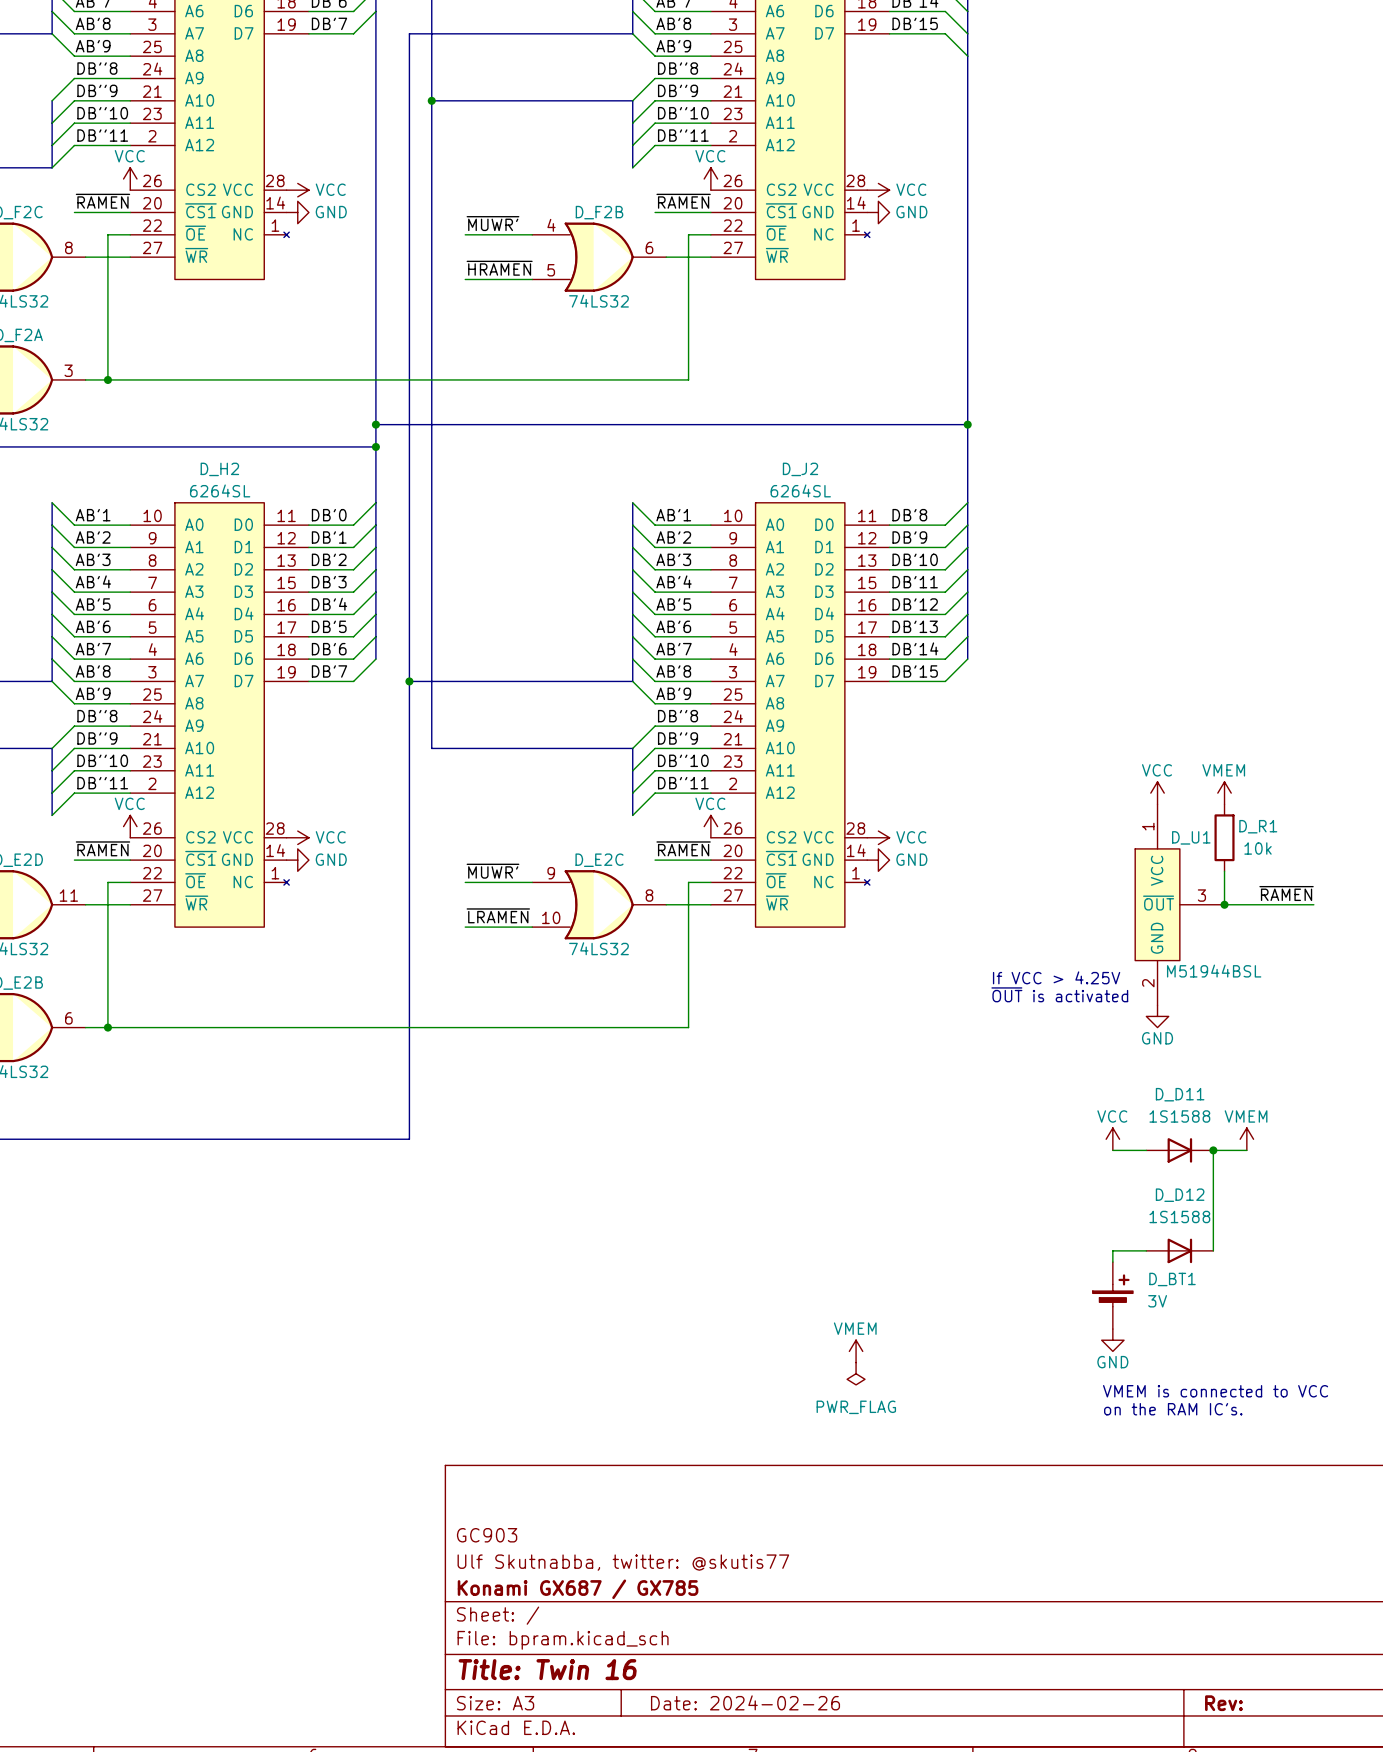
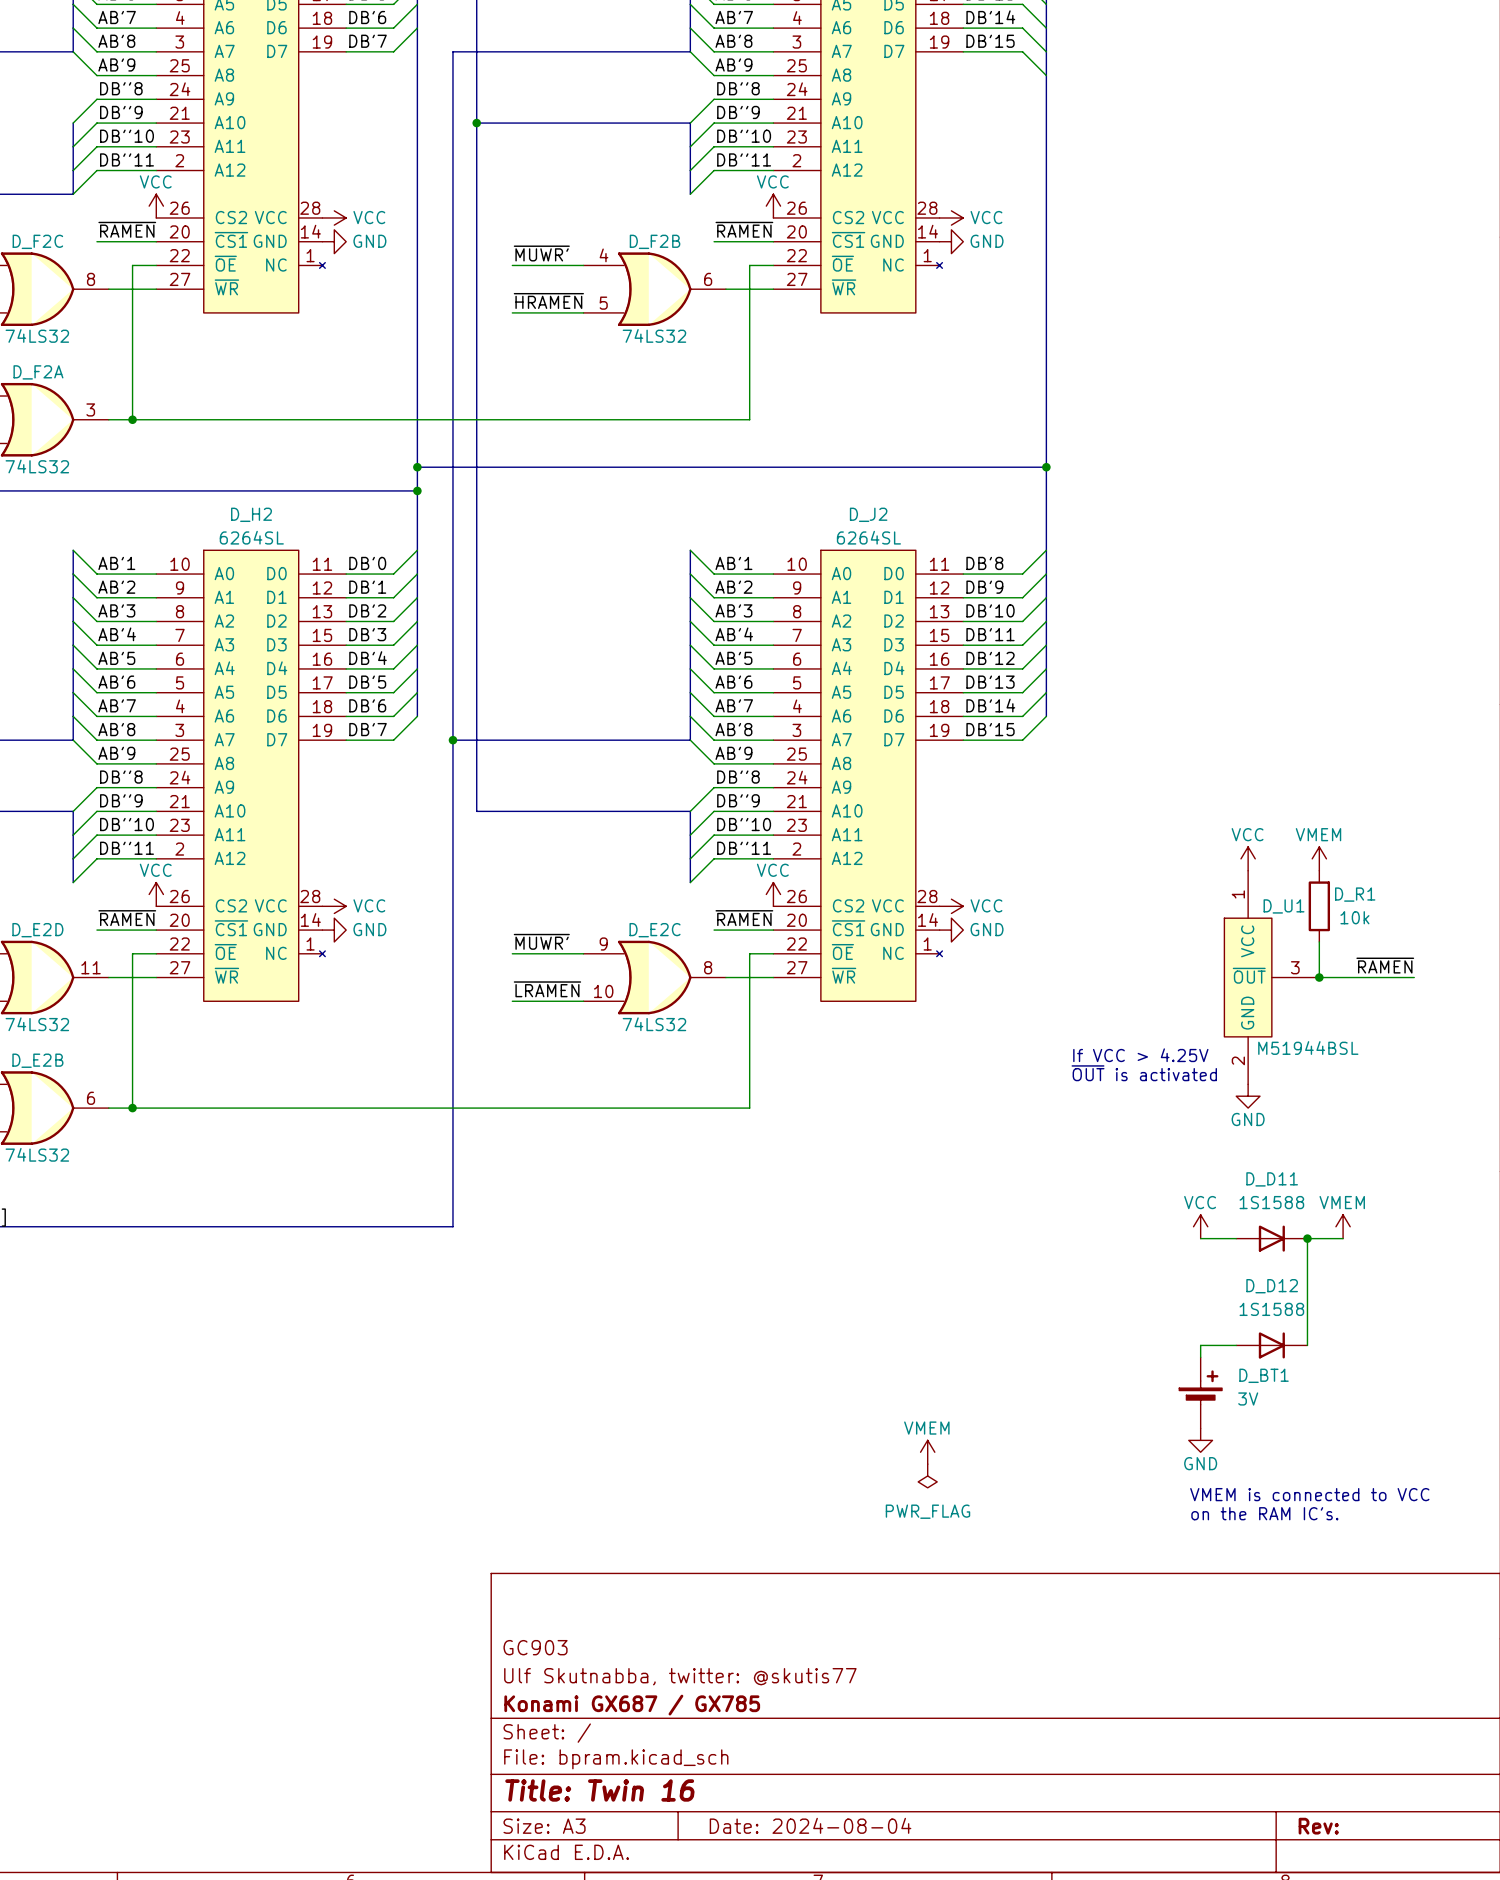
title block: Date: 2024-02-26 (745, 1702) -> Date: 2024-08-04 (810, 1825)

